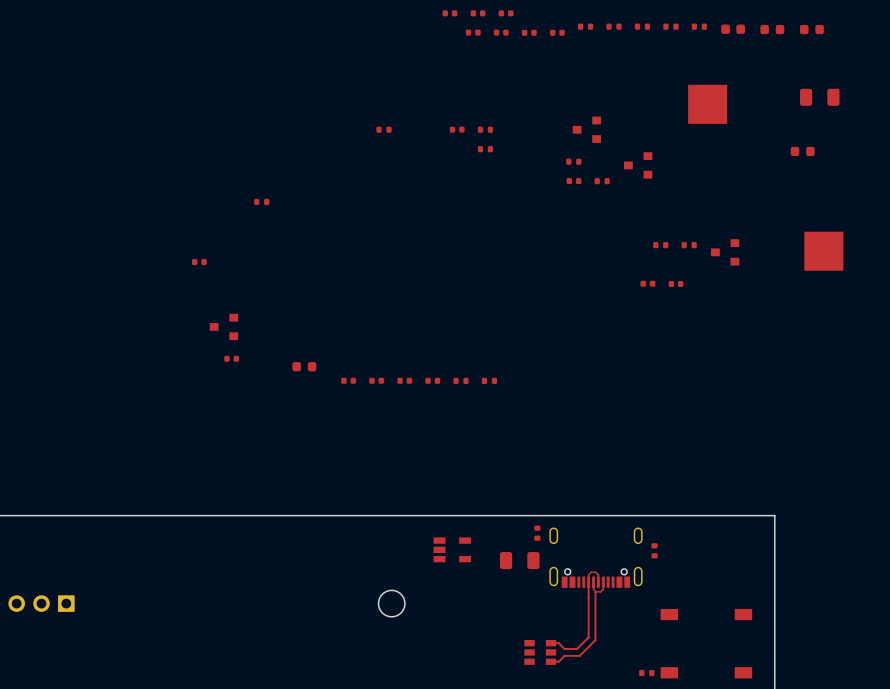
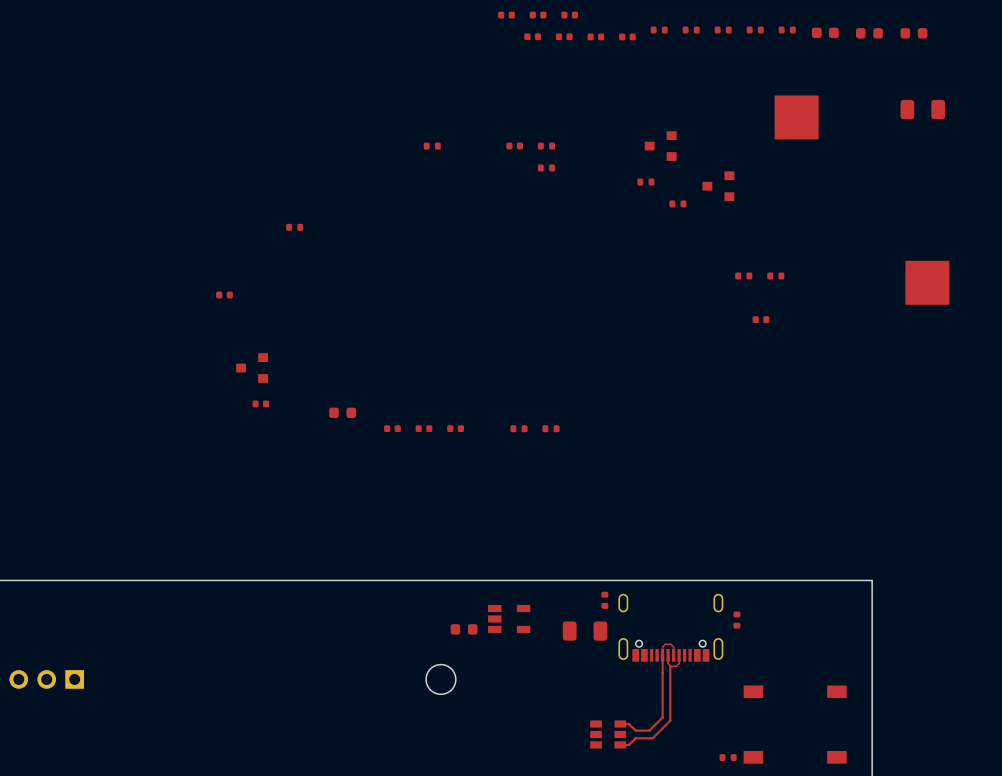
part: (802, 151) -> none
part: (573, 181) -> none
part: (725, 252) -> none
part: (647, 283) -> none
part: (432, 380) -> none
part: none -> (464, 629)

